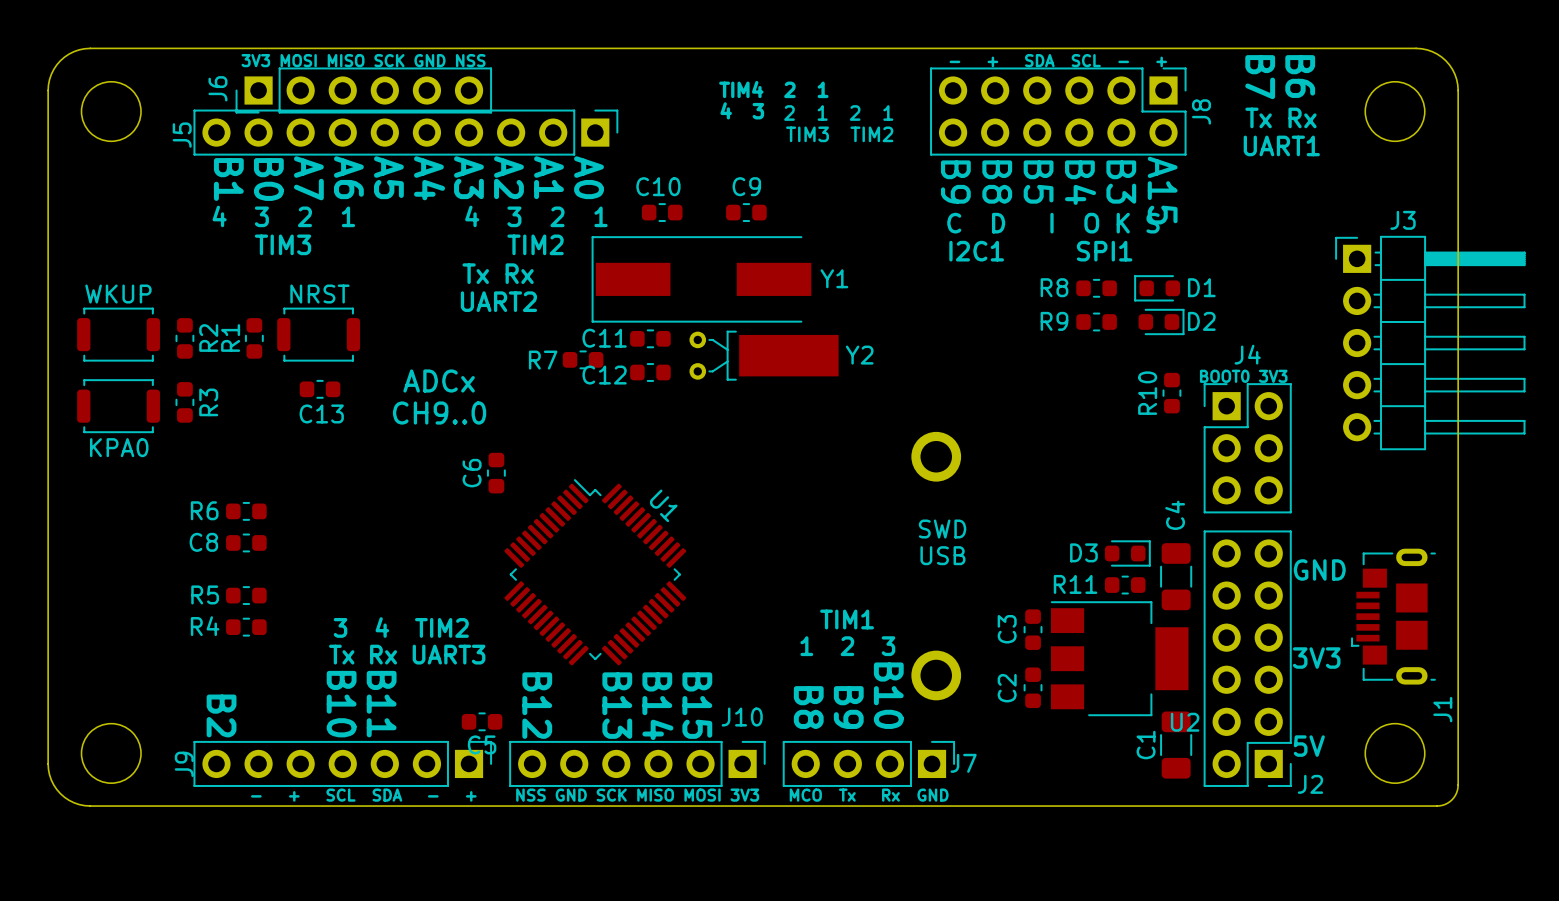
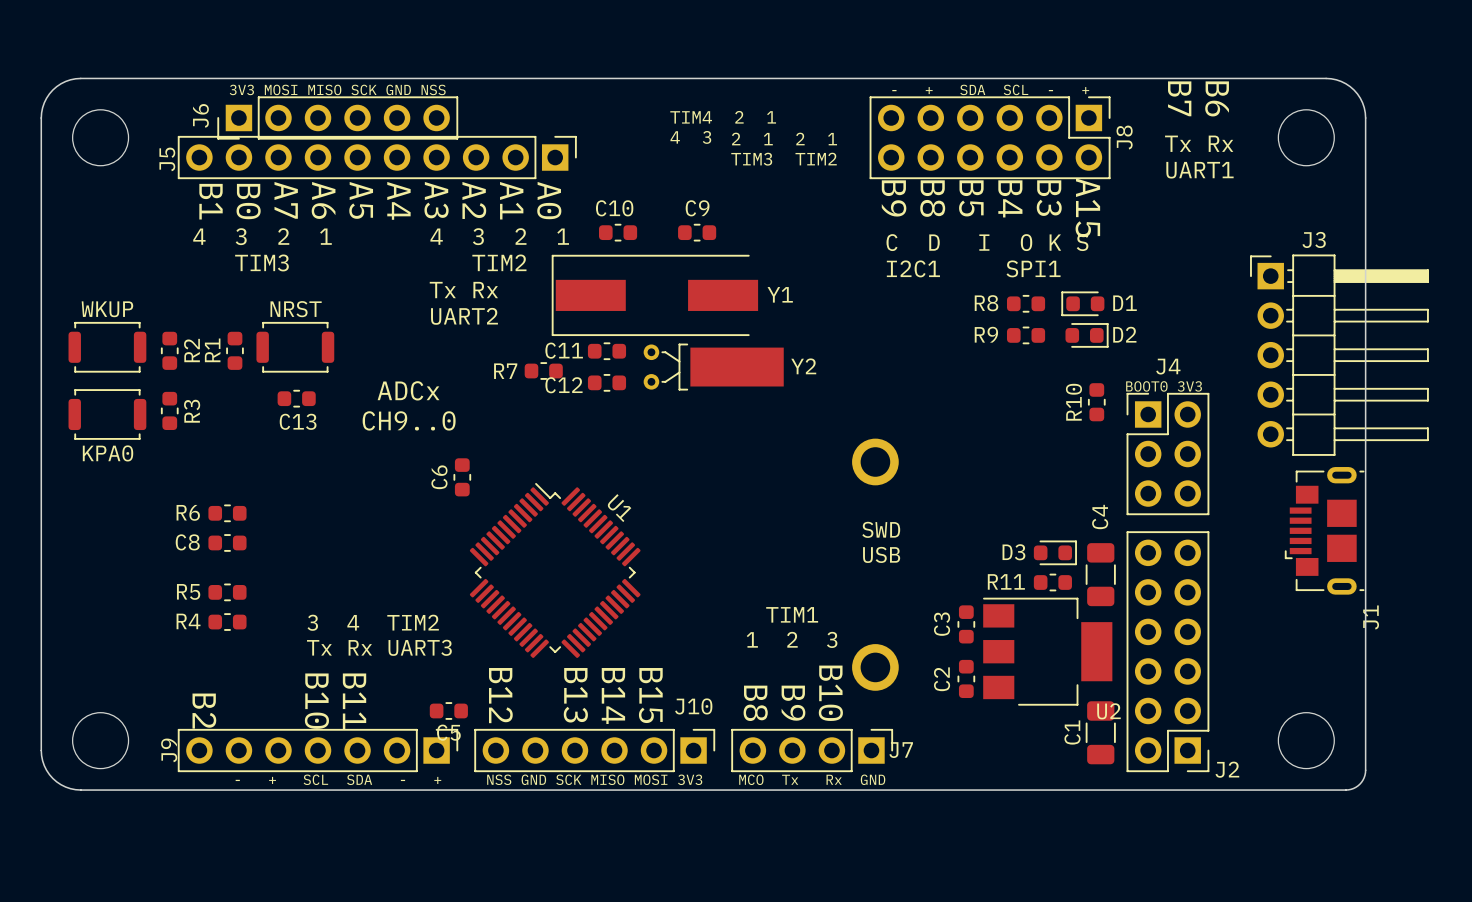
text: GND (1319, 569) -> none
J1 position: (1393, 616) -> (1324, 530)
text: 3V3 (1316, 658) -> none
text: 5V (1309, 746) -> none

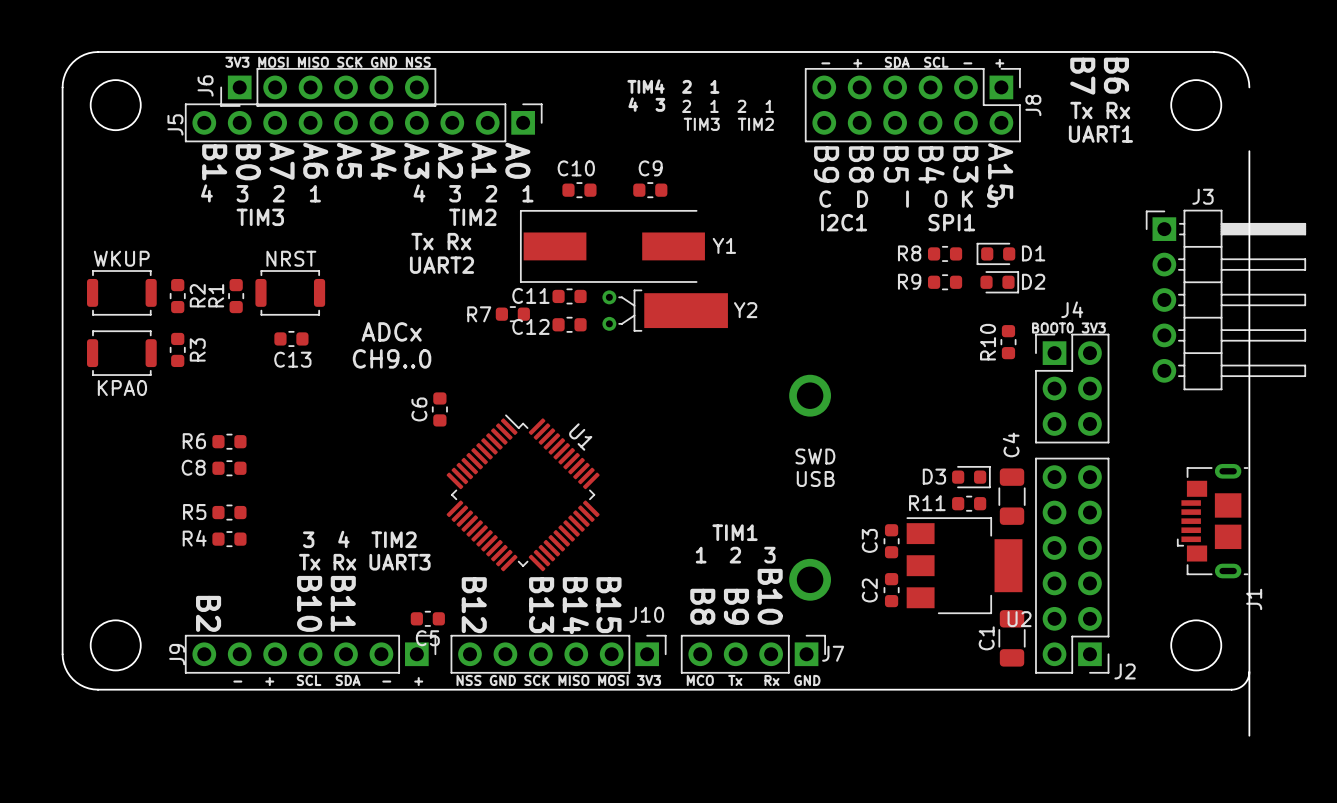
board edge: (1365, 117) (1365, 189) -> none
J1 position: (1324, 530) -> (1212, 521)
board edge: none -> (1249, 671) (1249, 735)

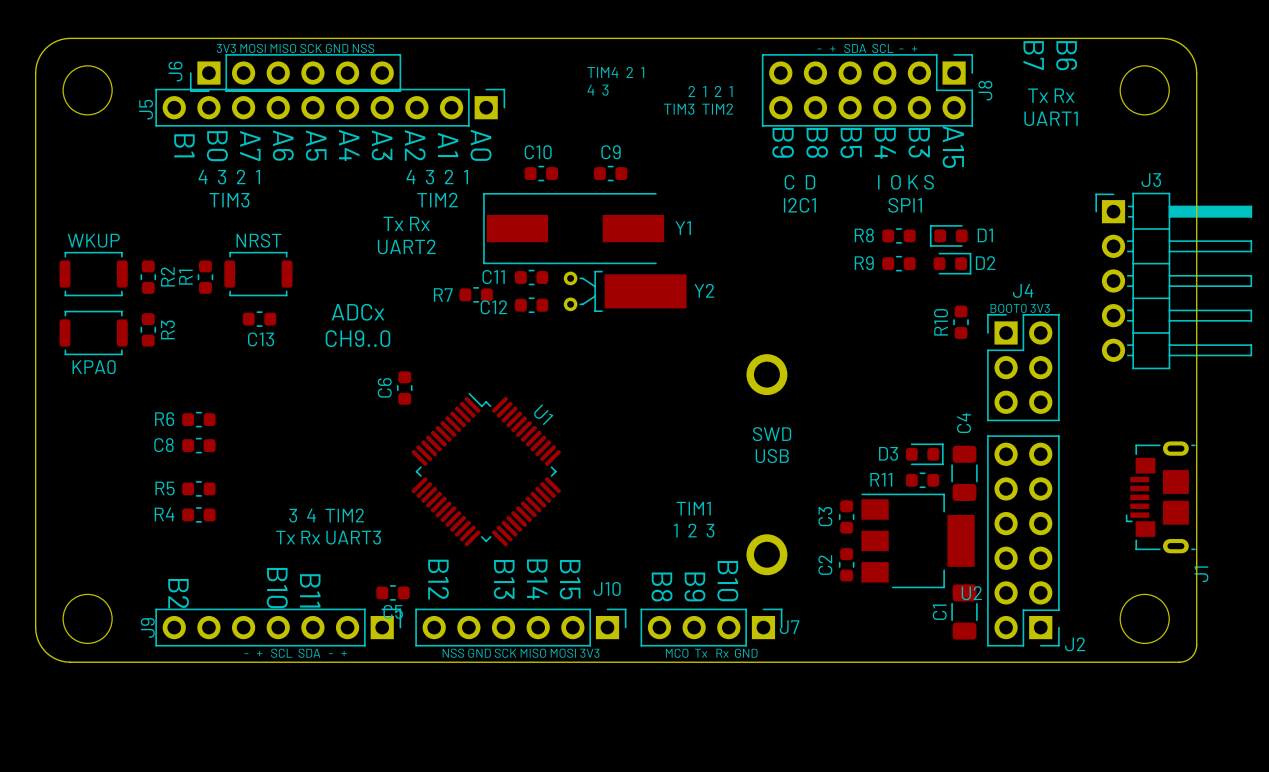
board edge: none -> (1196, 73) (1196, 135)
board edge: (1249, 671) (1249, 735) -> none

